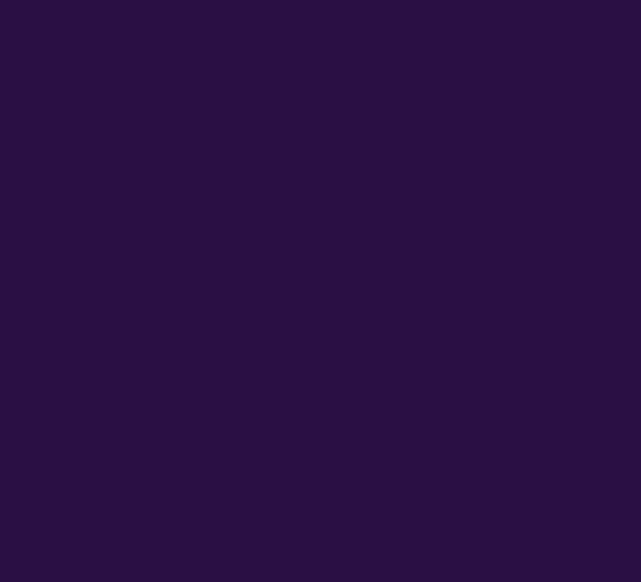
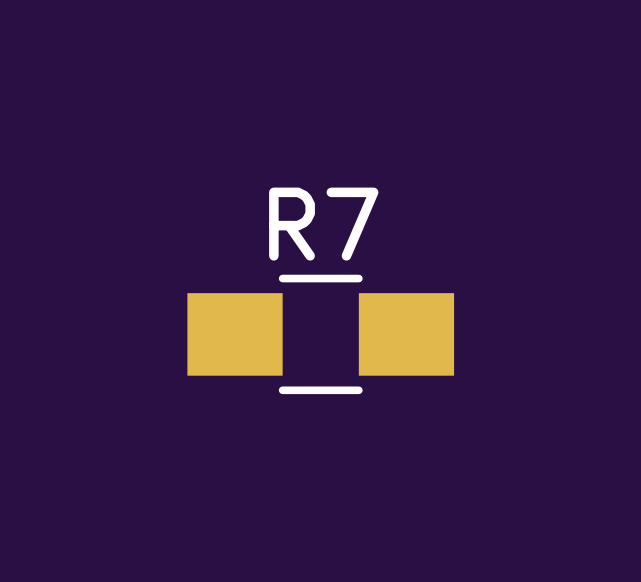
R7: none -> (320, 334)

